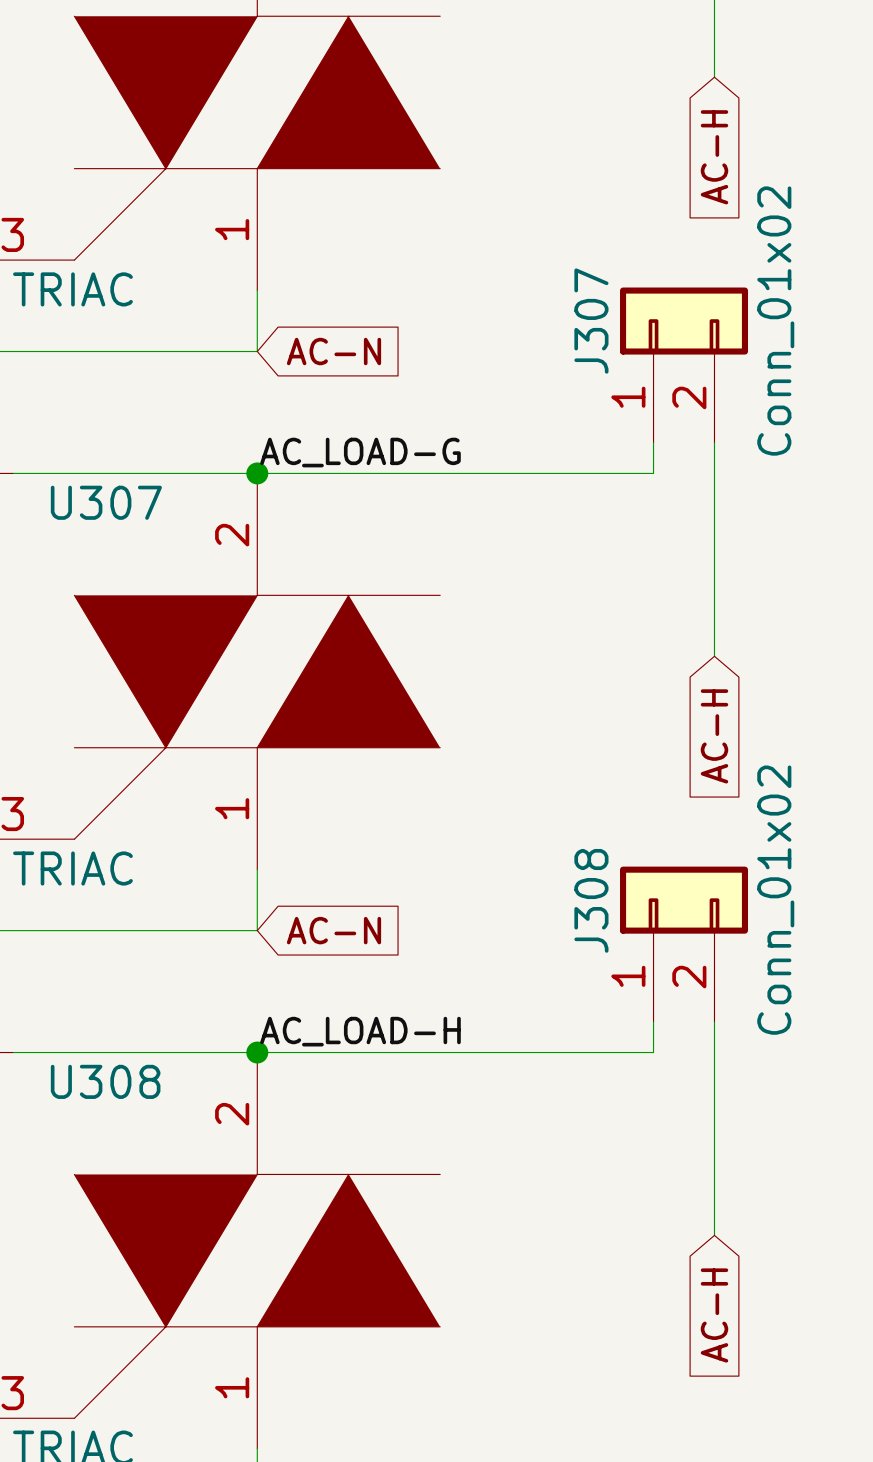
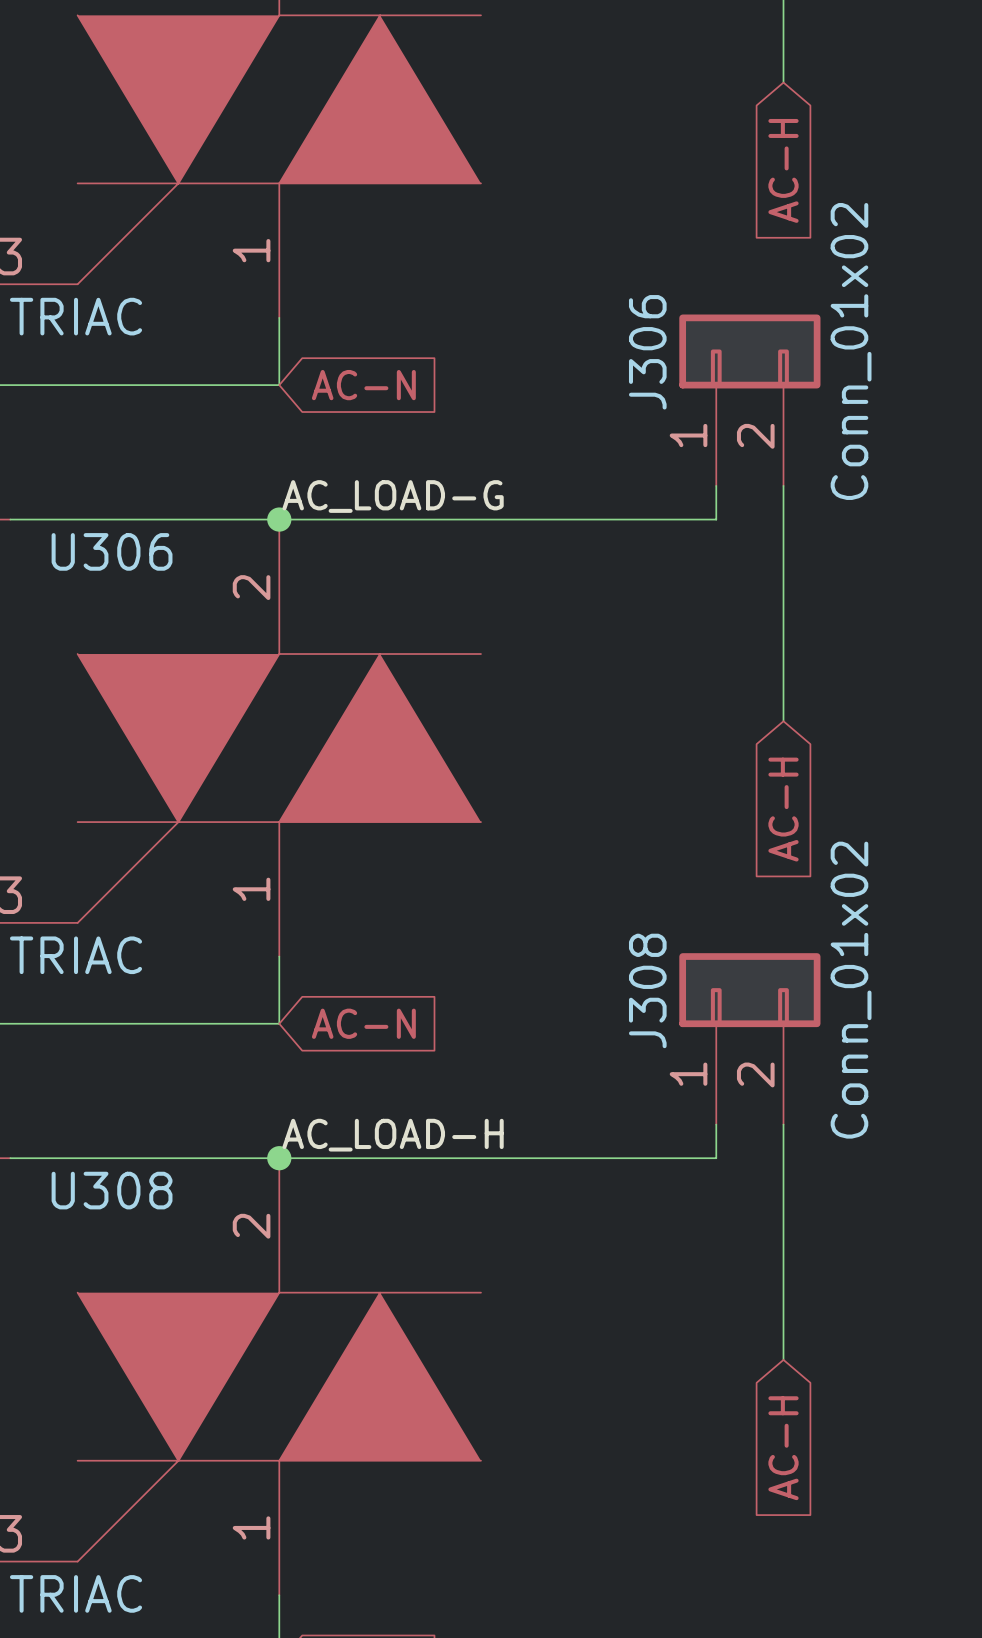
J307 name: J307 (591, 321) -> J306 (647, 352)
U307 name: U307 (106, 502) -> U306 (112, 551)

